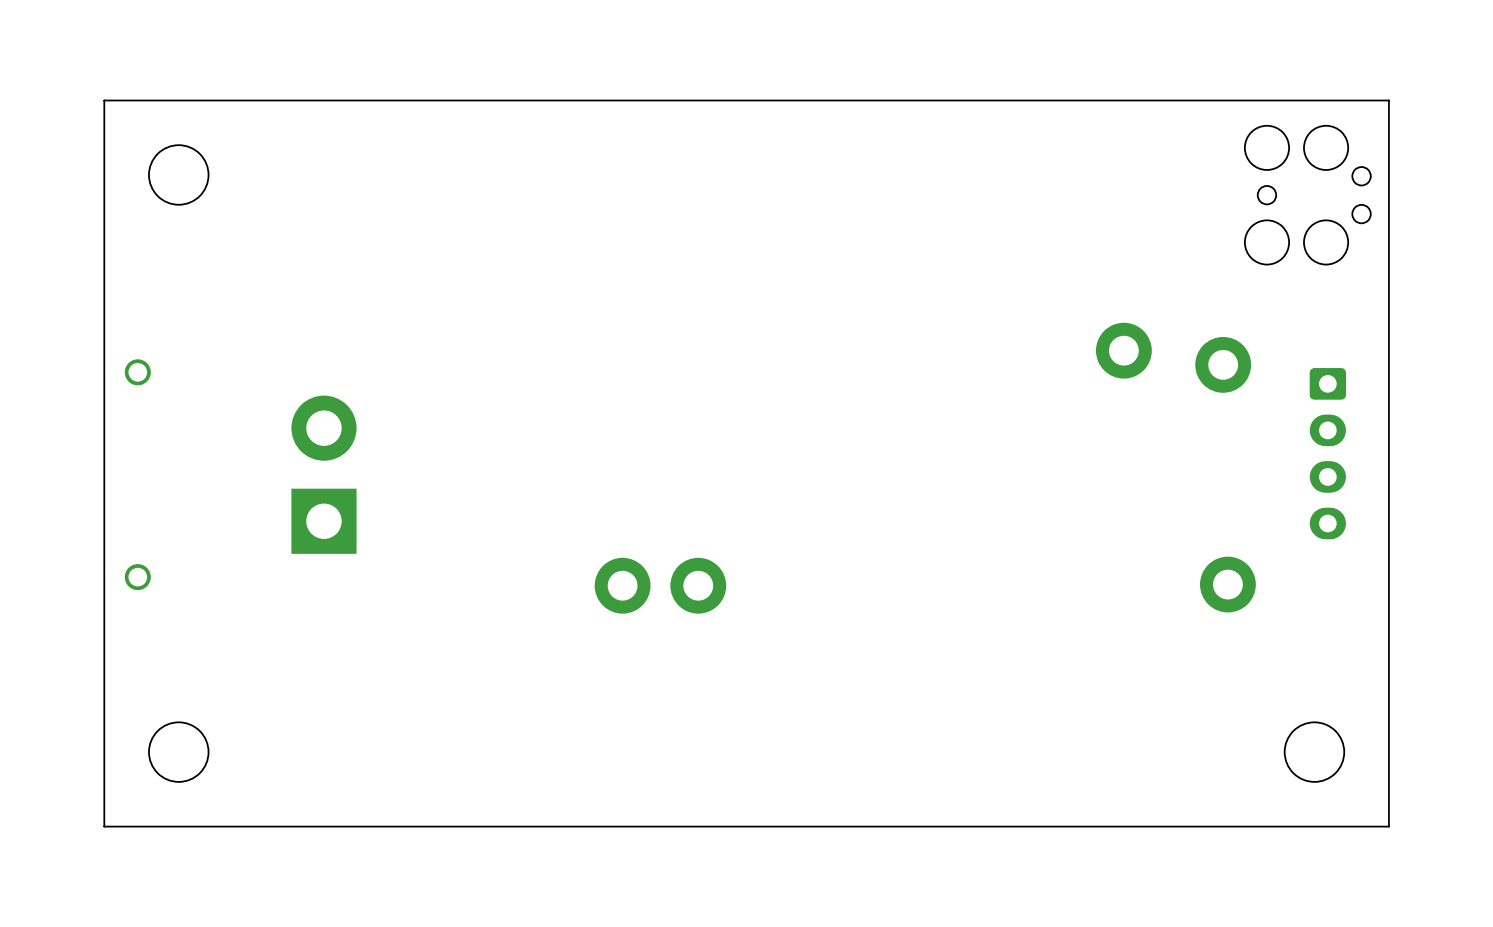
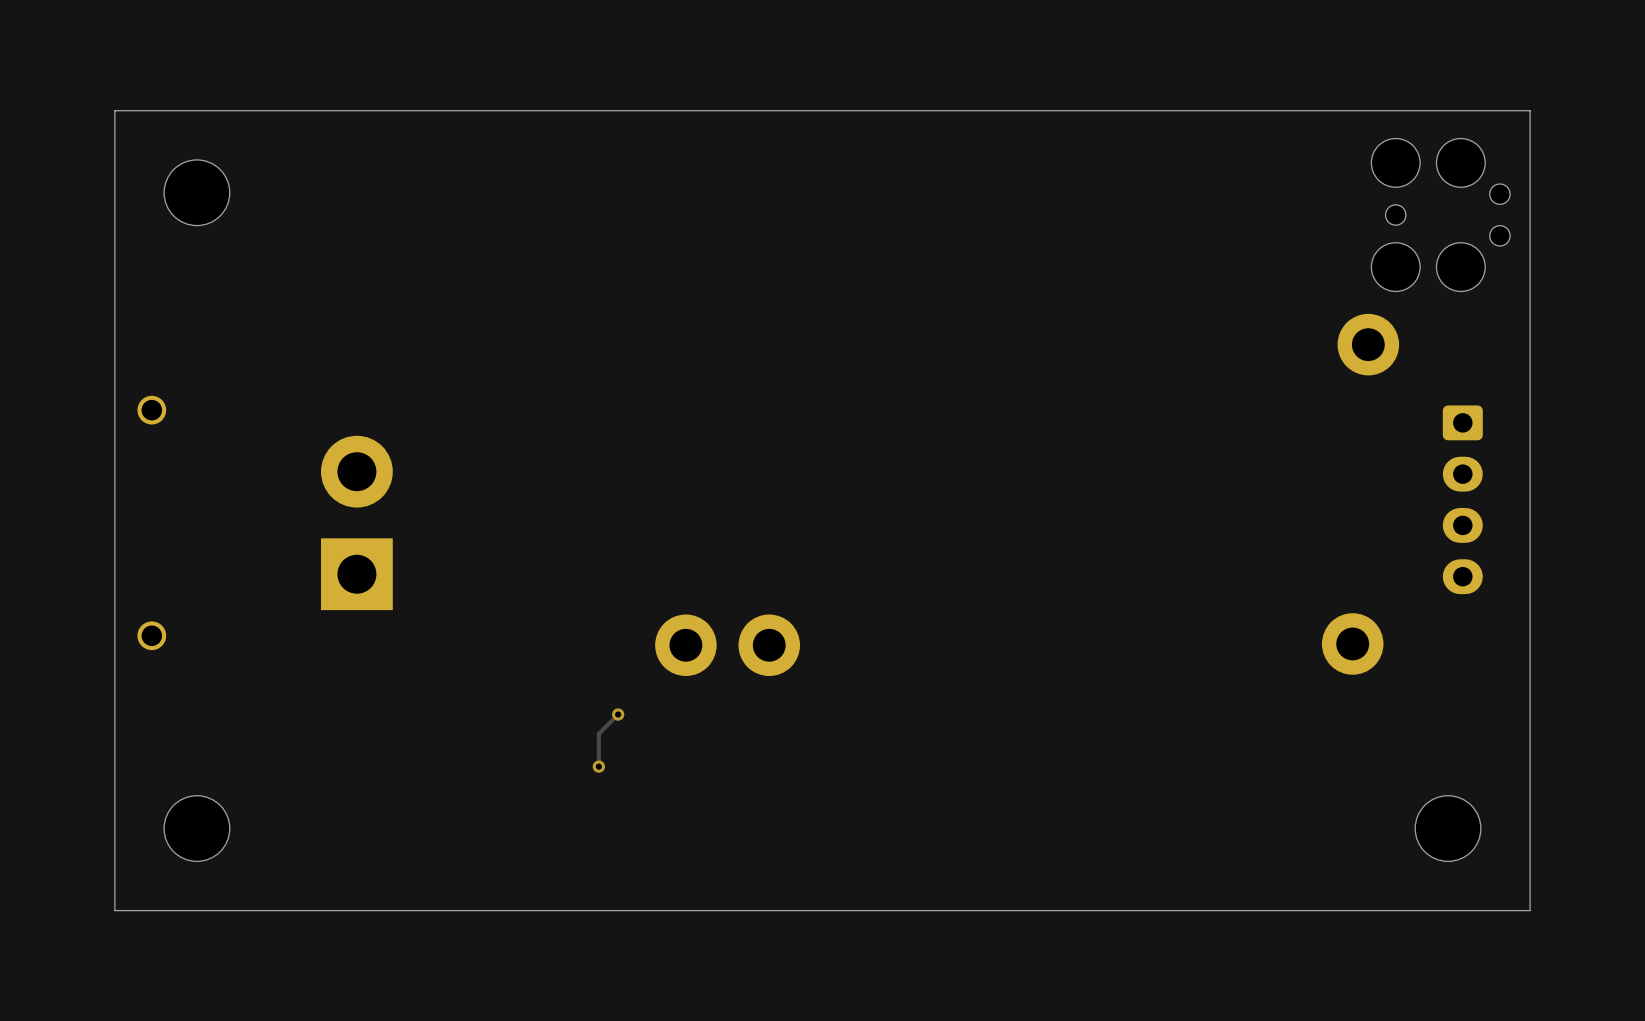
part: (1123, 350) -> none
part position: (1223, 364) -> (1368, 344)
track: none -> (618, 714) (598, 733) (598, 766)
via: none -> (618, 714)
via: none -> (598, 766)

